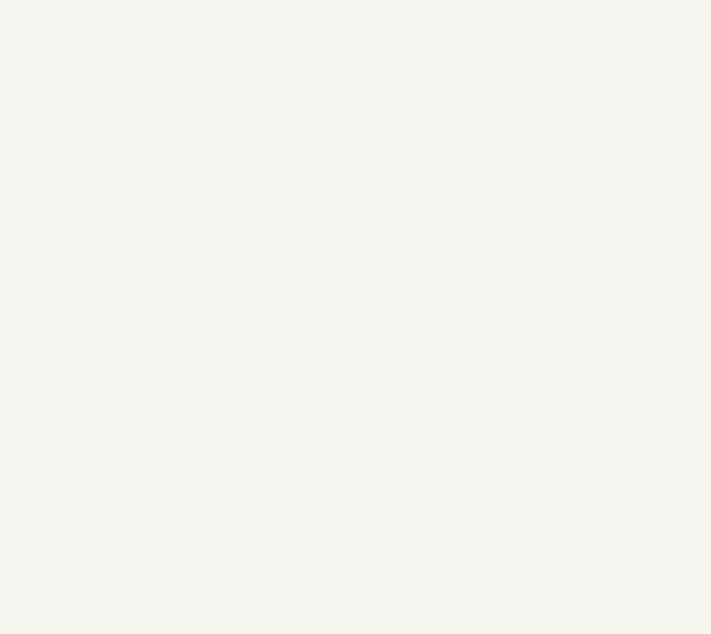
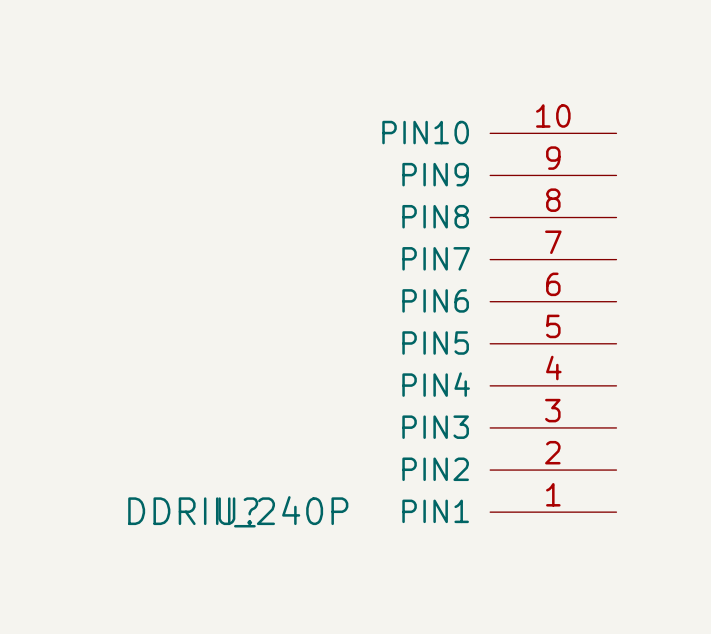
U?: none -> DDRIII_240P (553, 322)

